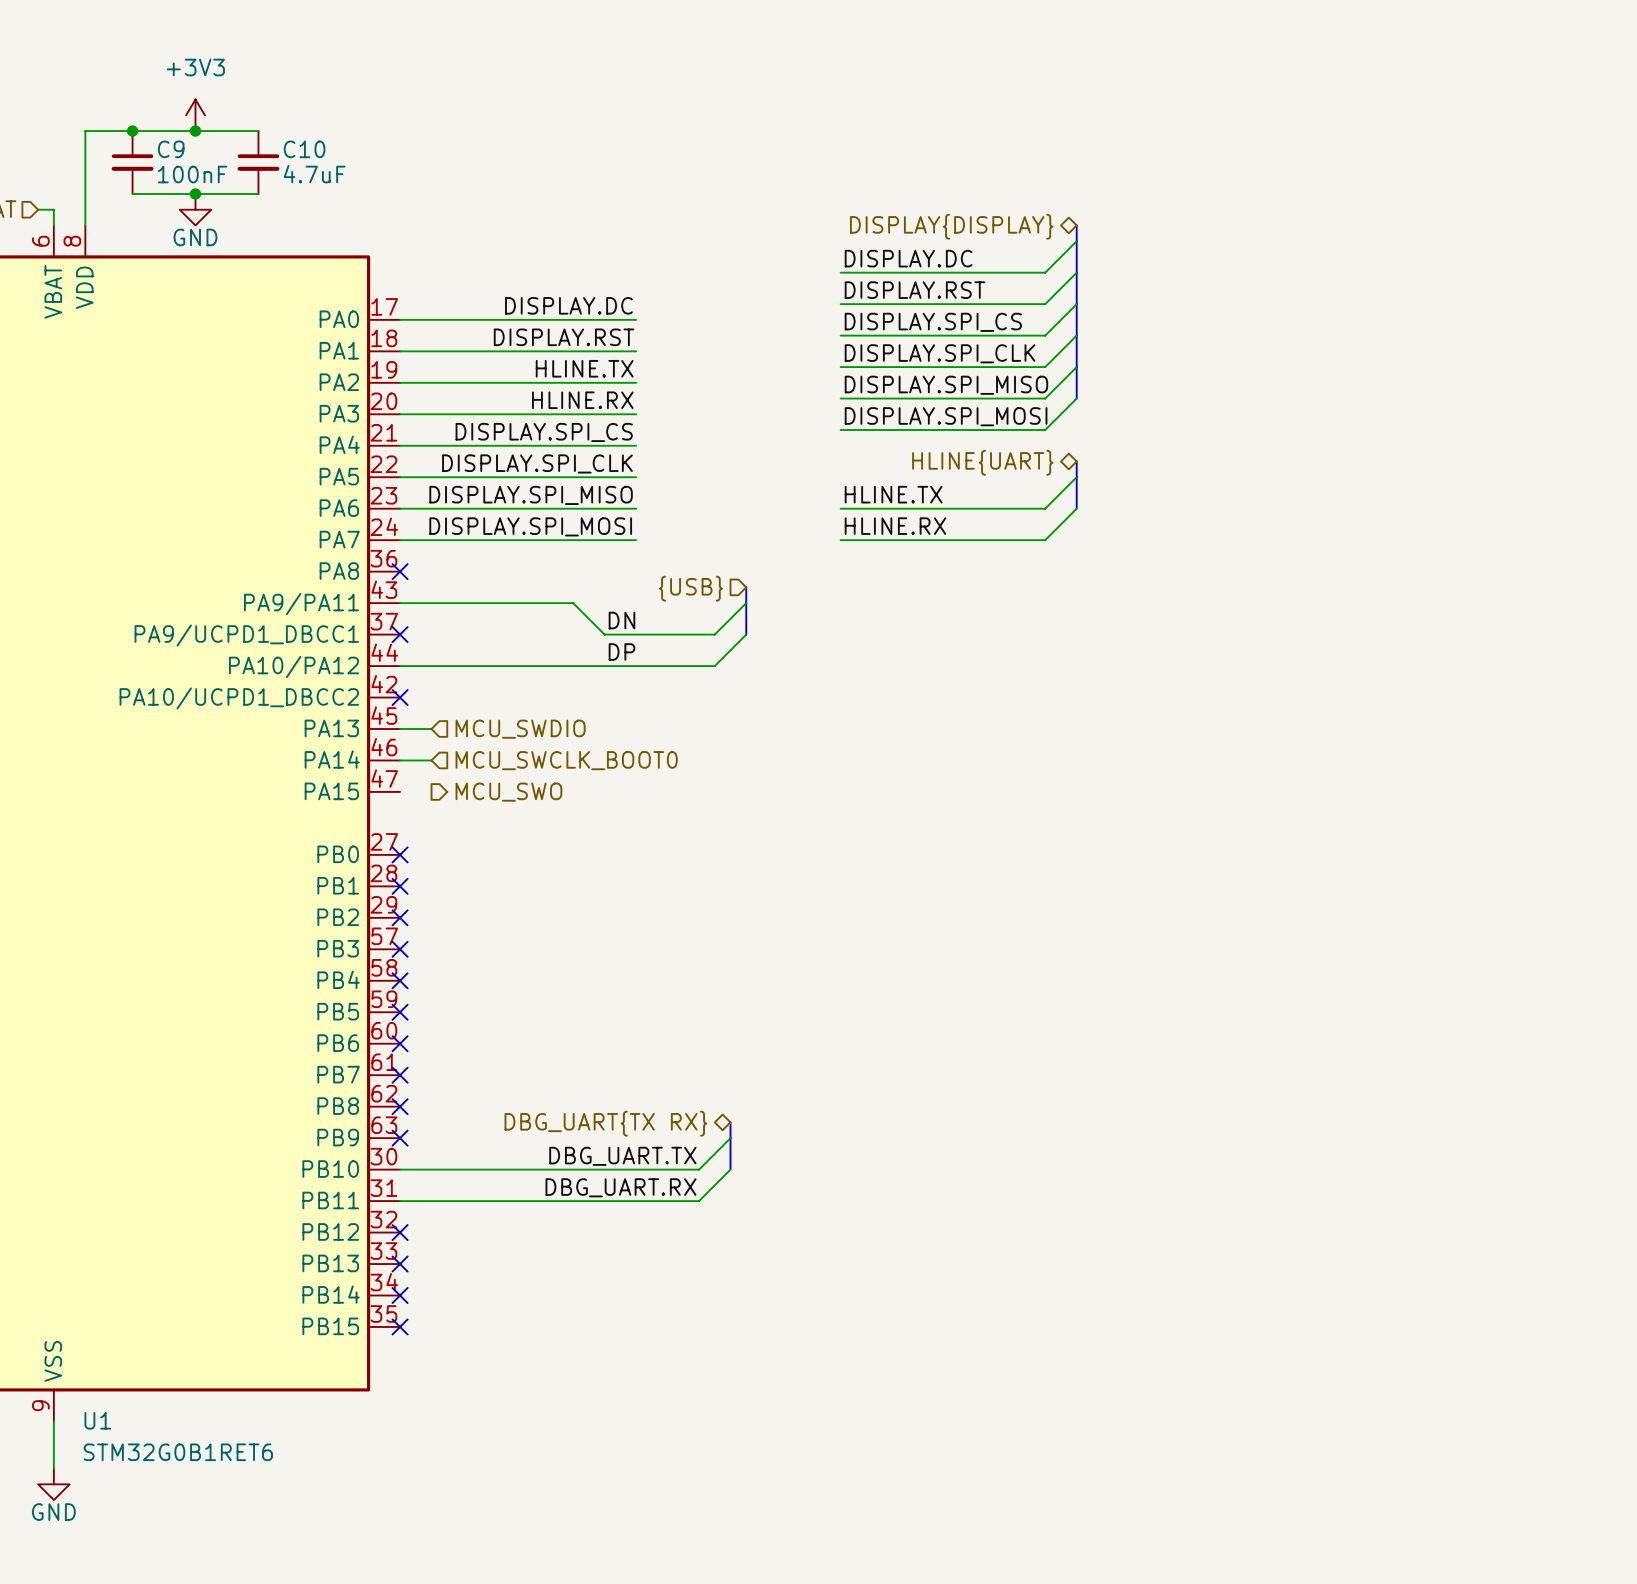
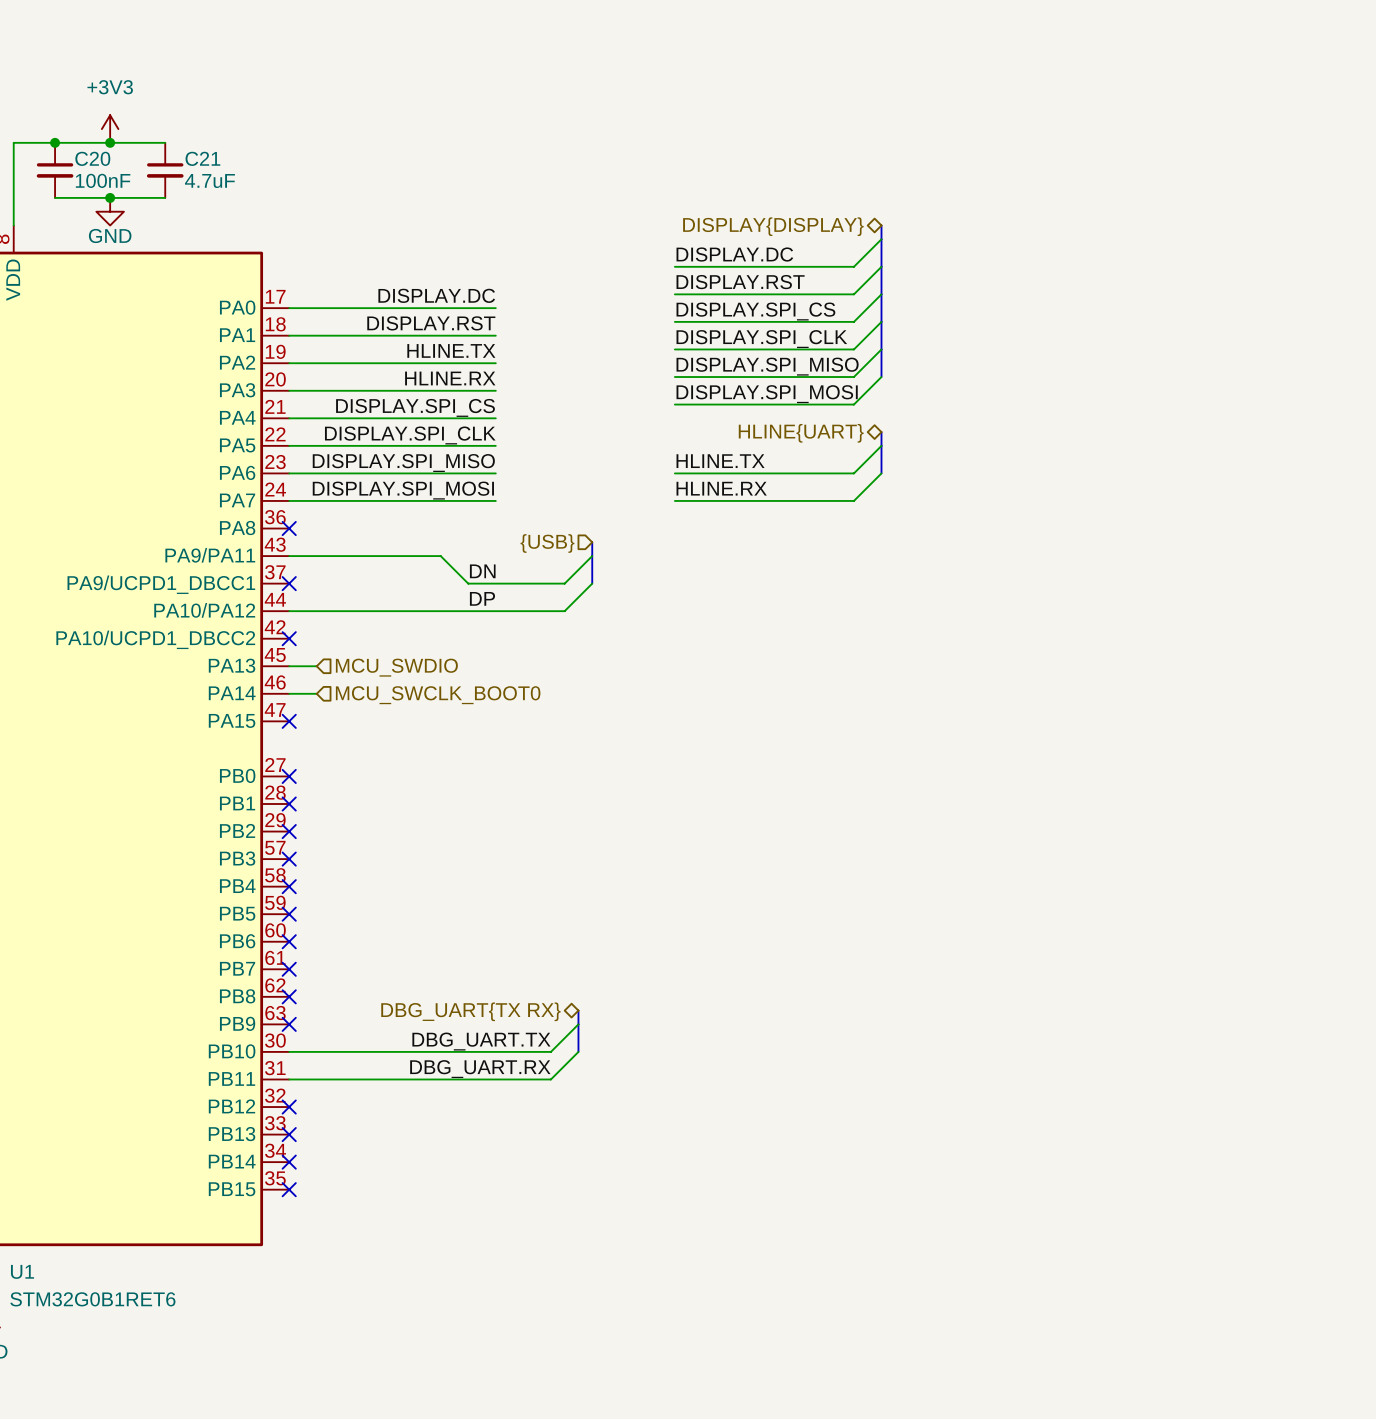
C9 name: C9 (171, 149) -> C20 (92, 158)
C10 name: C10 (304, 149) -> C21 (202, 158)
no-connect mark: none -> (289, 721)
hierarchical label: MCU_SWO (508, 792) -> none

